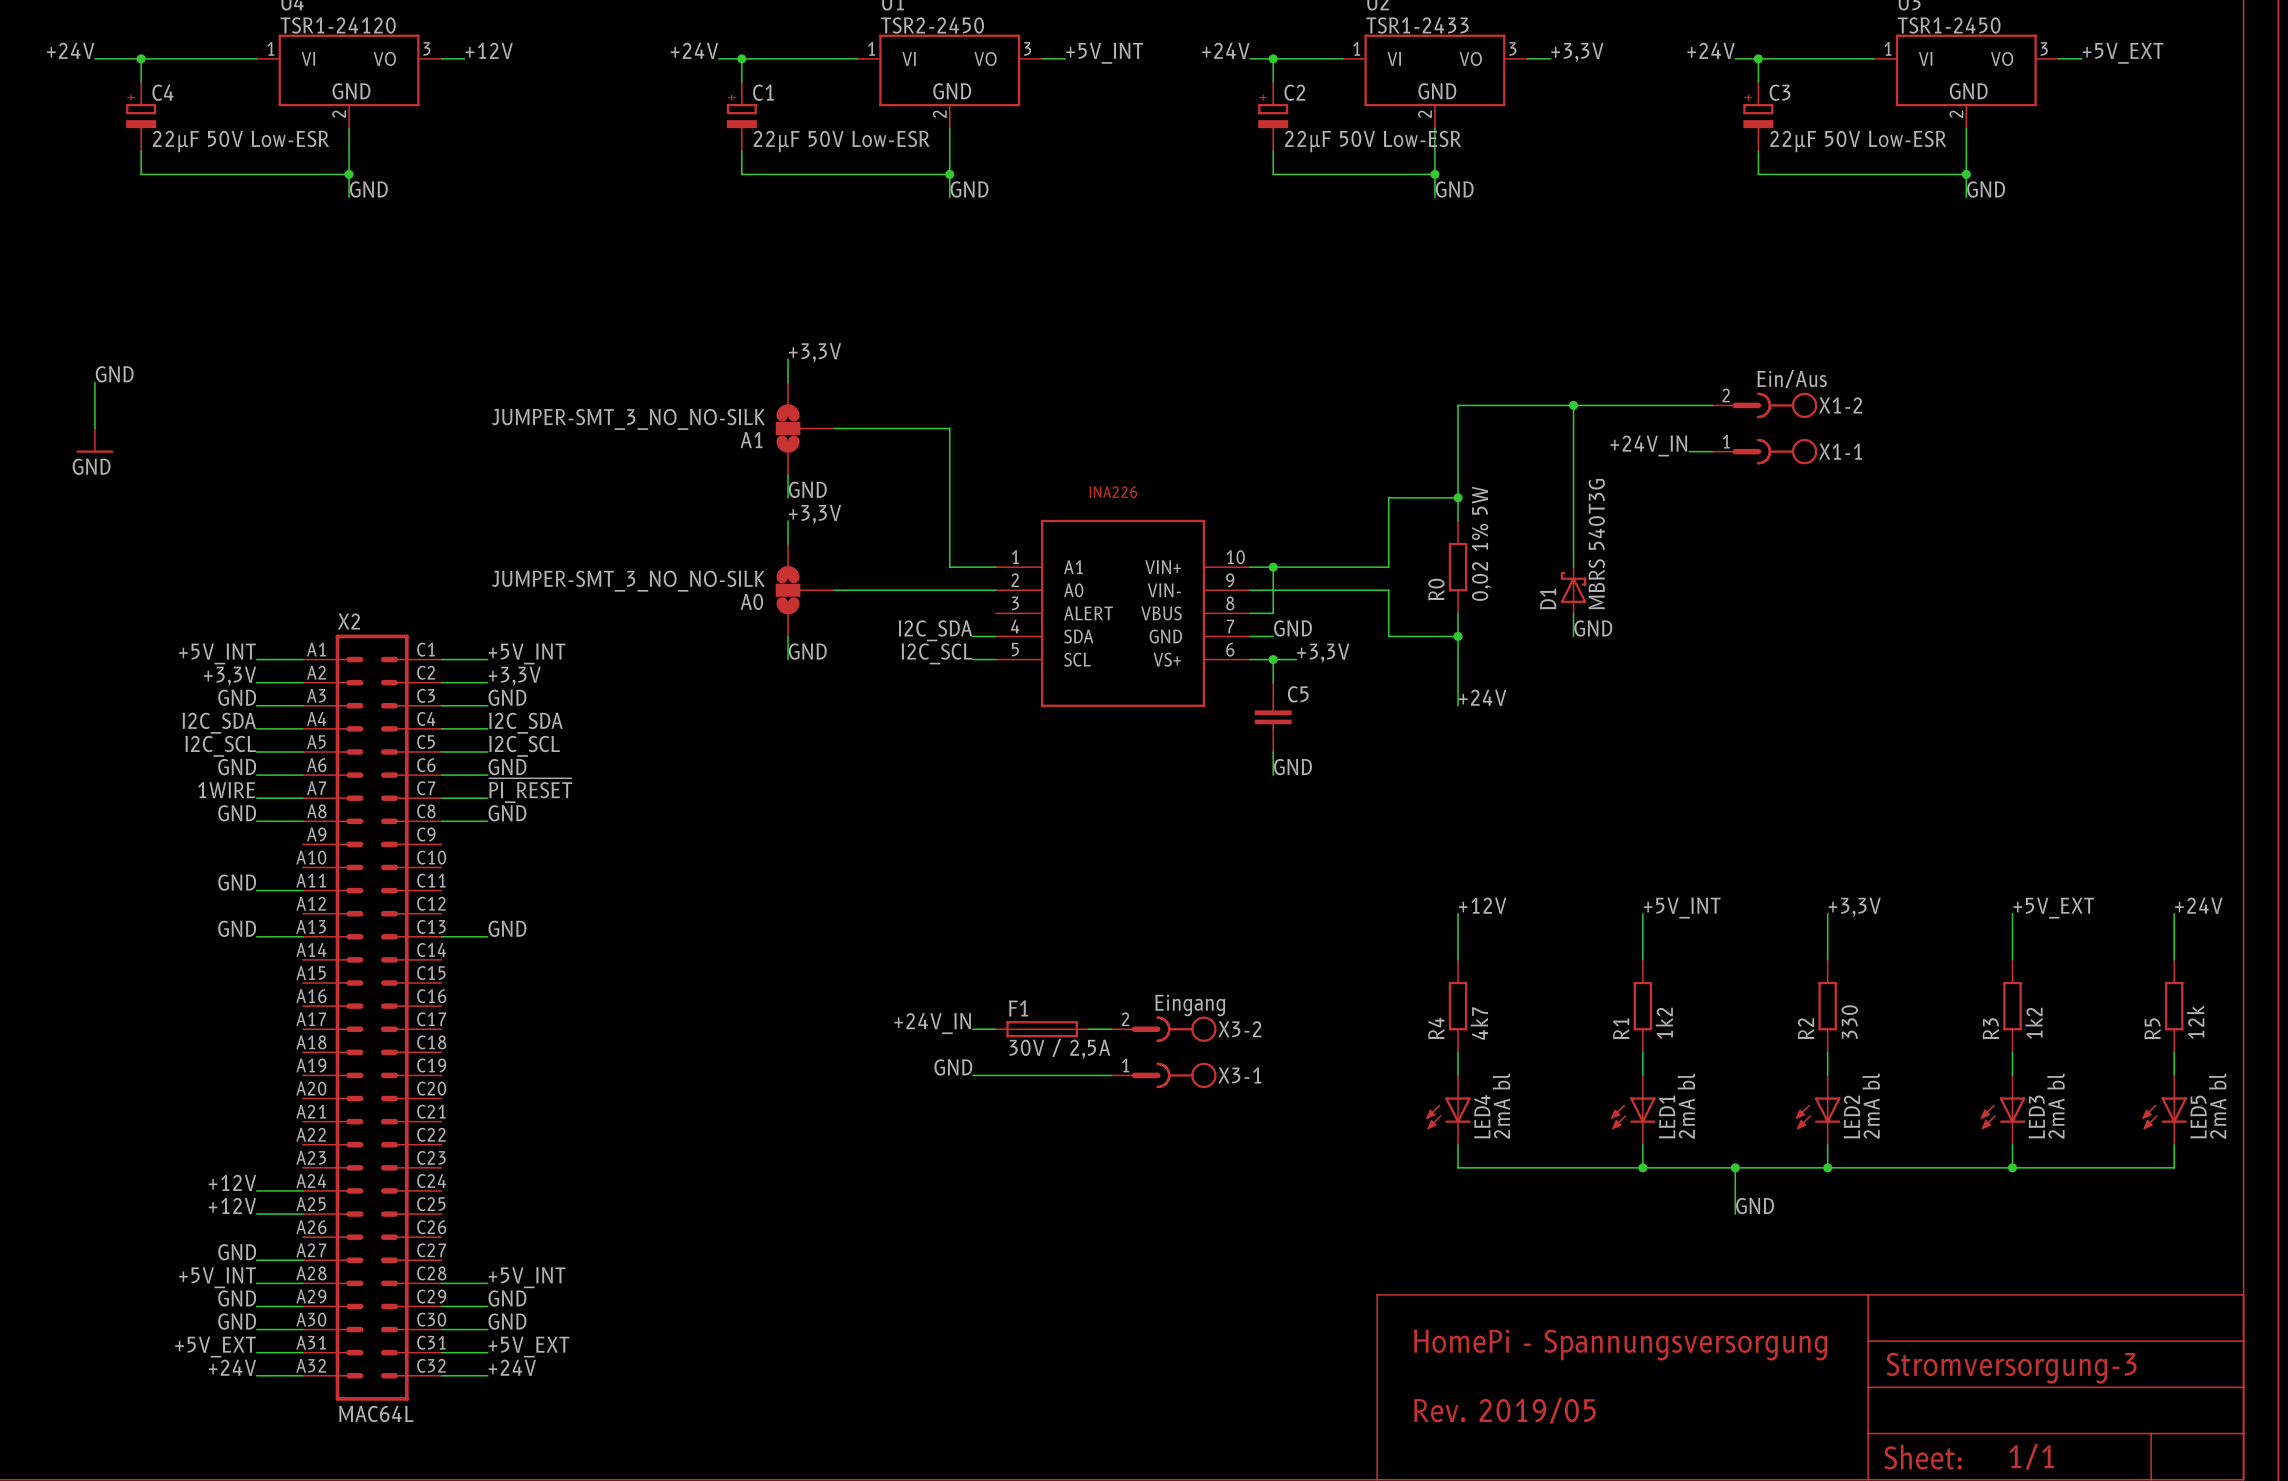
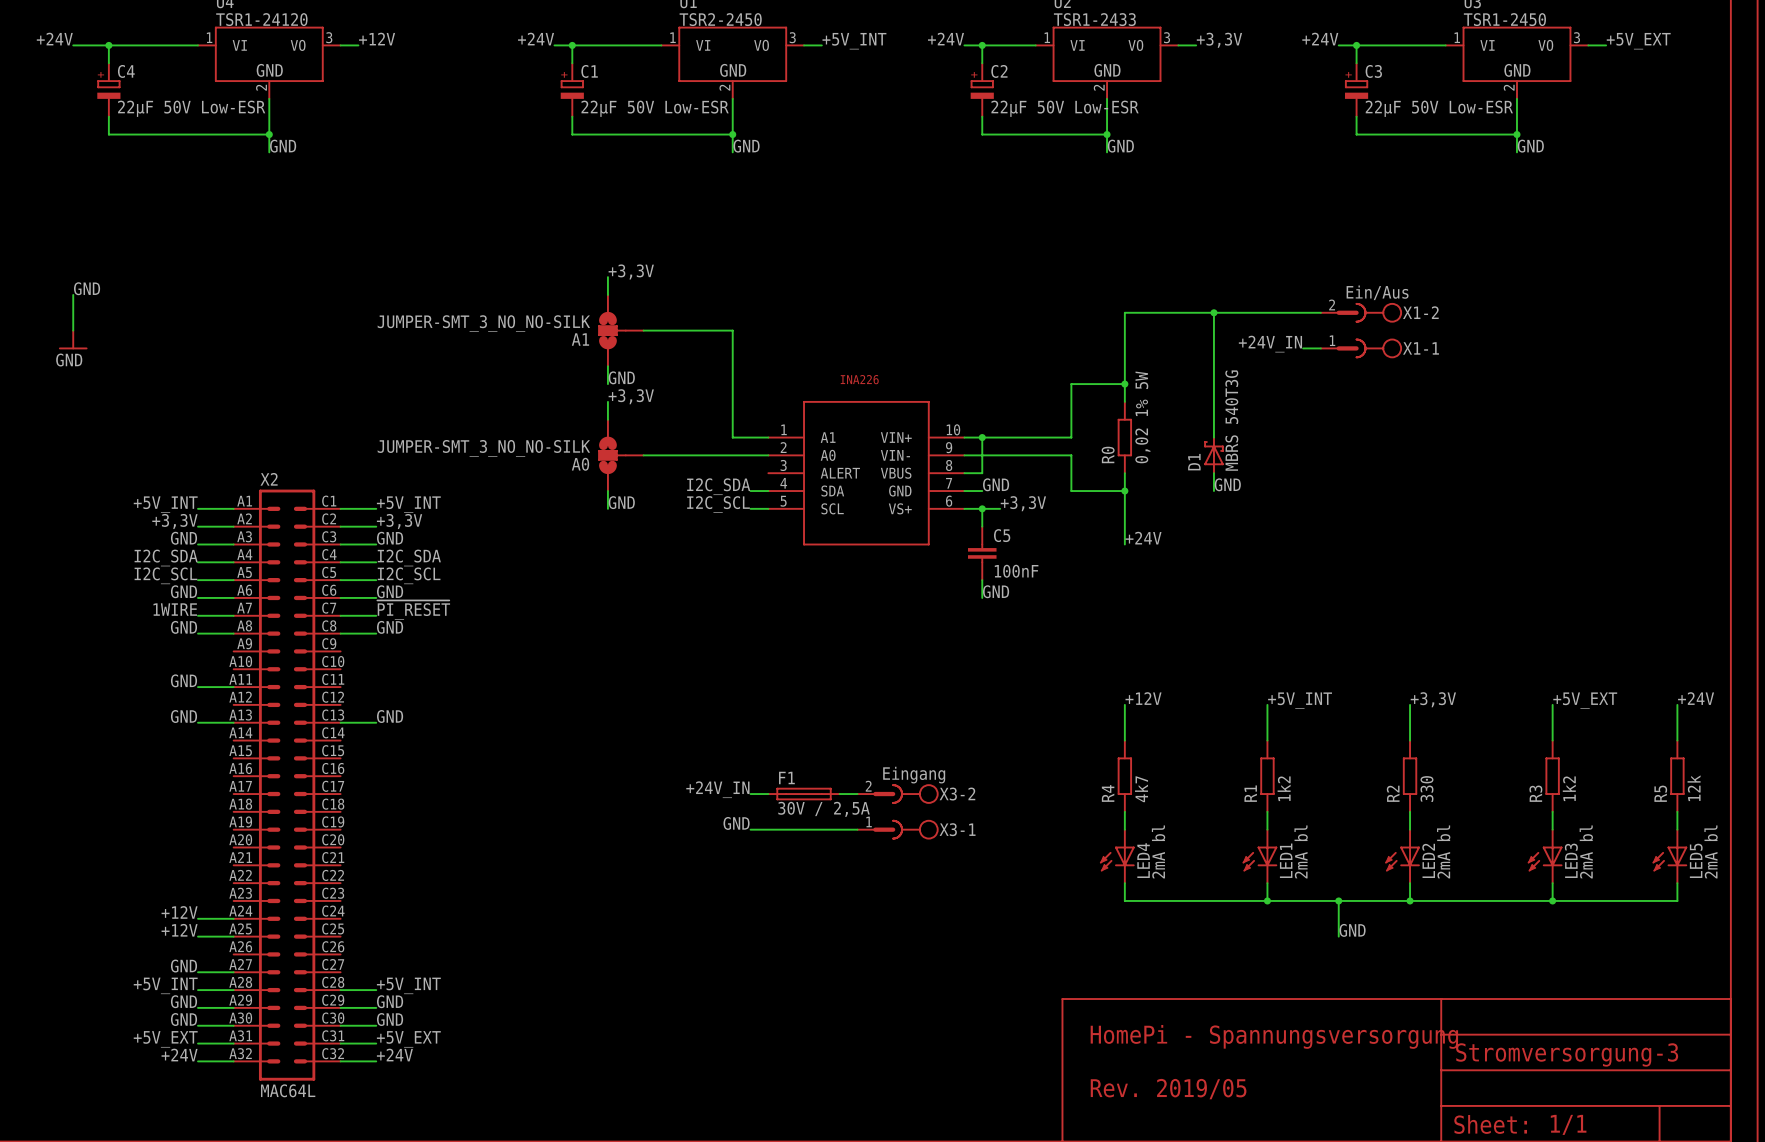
C5 value: none -> 100nF (1016, 571)

